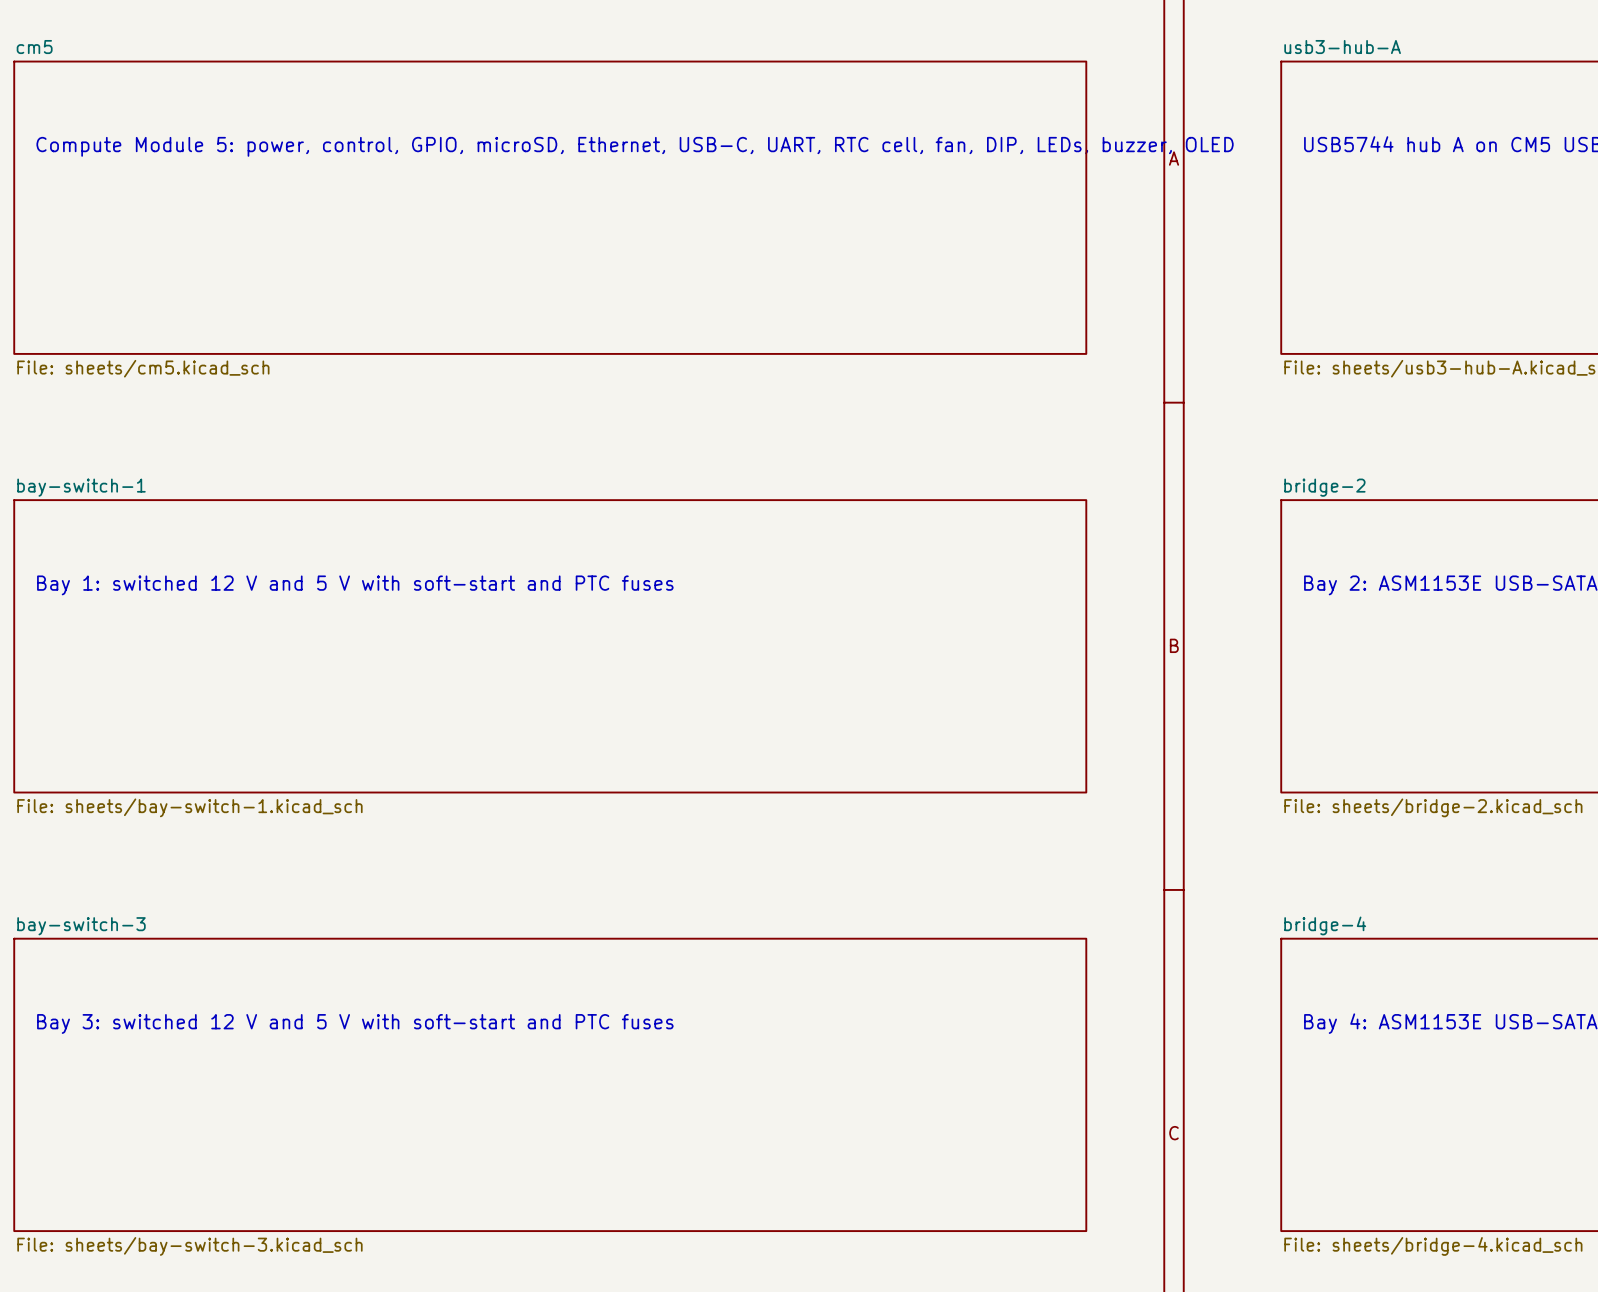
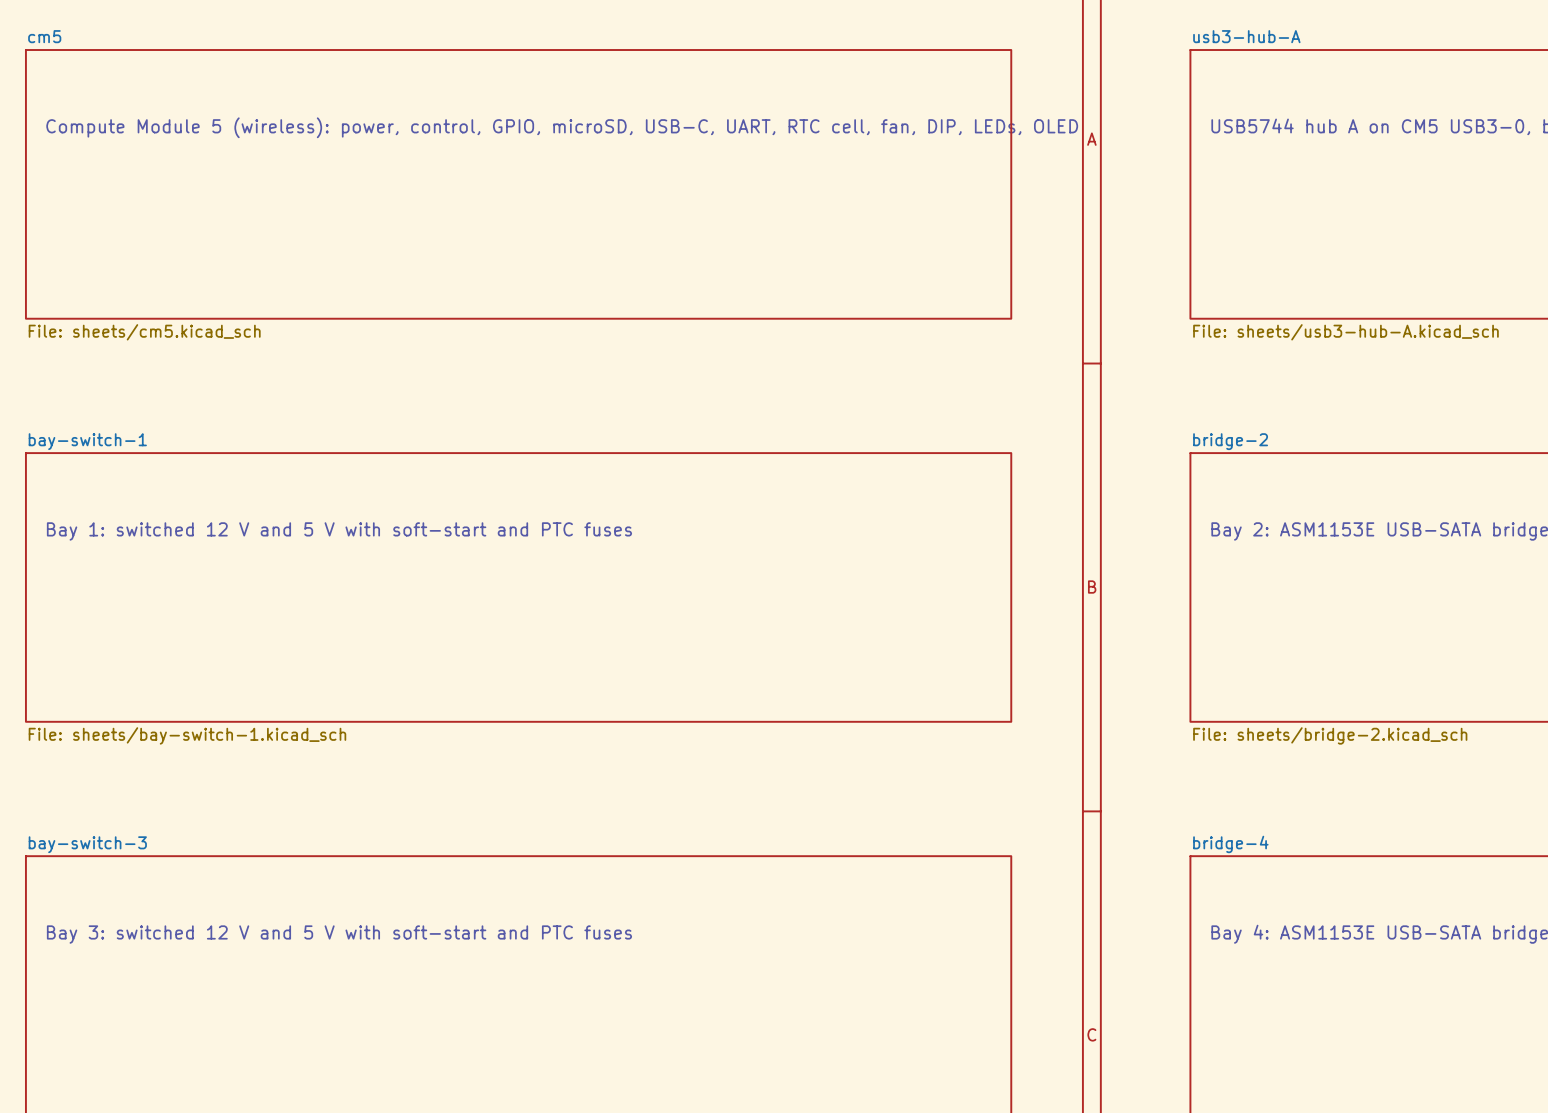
text: Compute Module 5: power, control, GPIO, microSD, Ethernet, USB-C, UART, RTC cell, fan, DIP, LEDs, buzzer, OLED (635, 146) -> Compute Module 5 (wireless): power, control, GPIO, microSD, USB-C, UART, RTC cell, fan, DIP, LEDs, OLED (562, 127)

